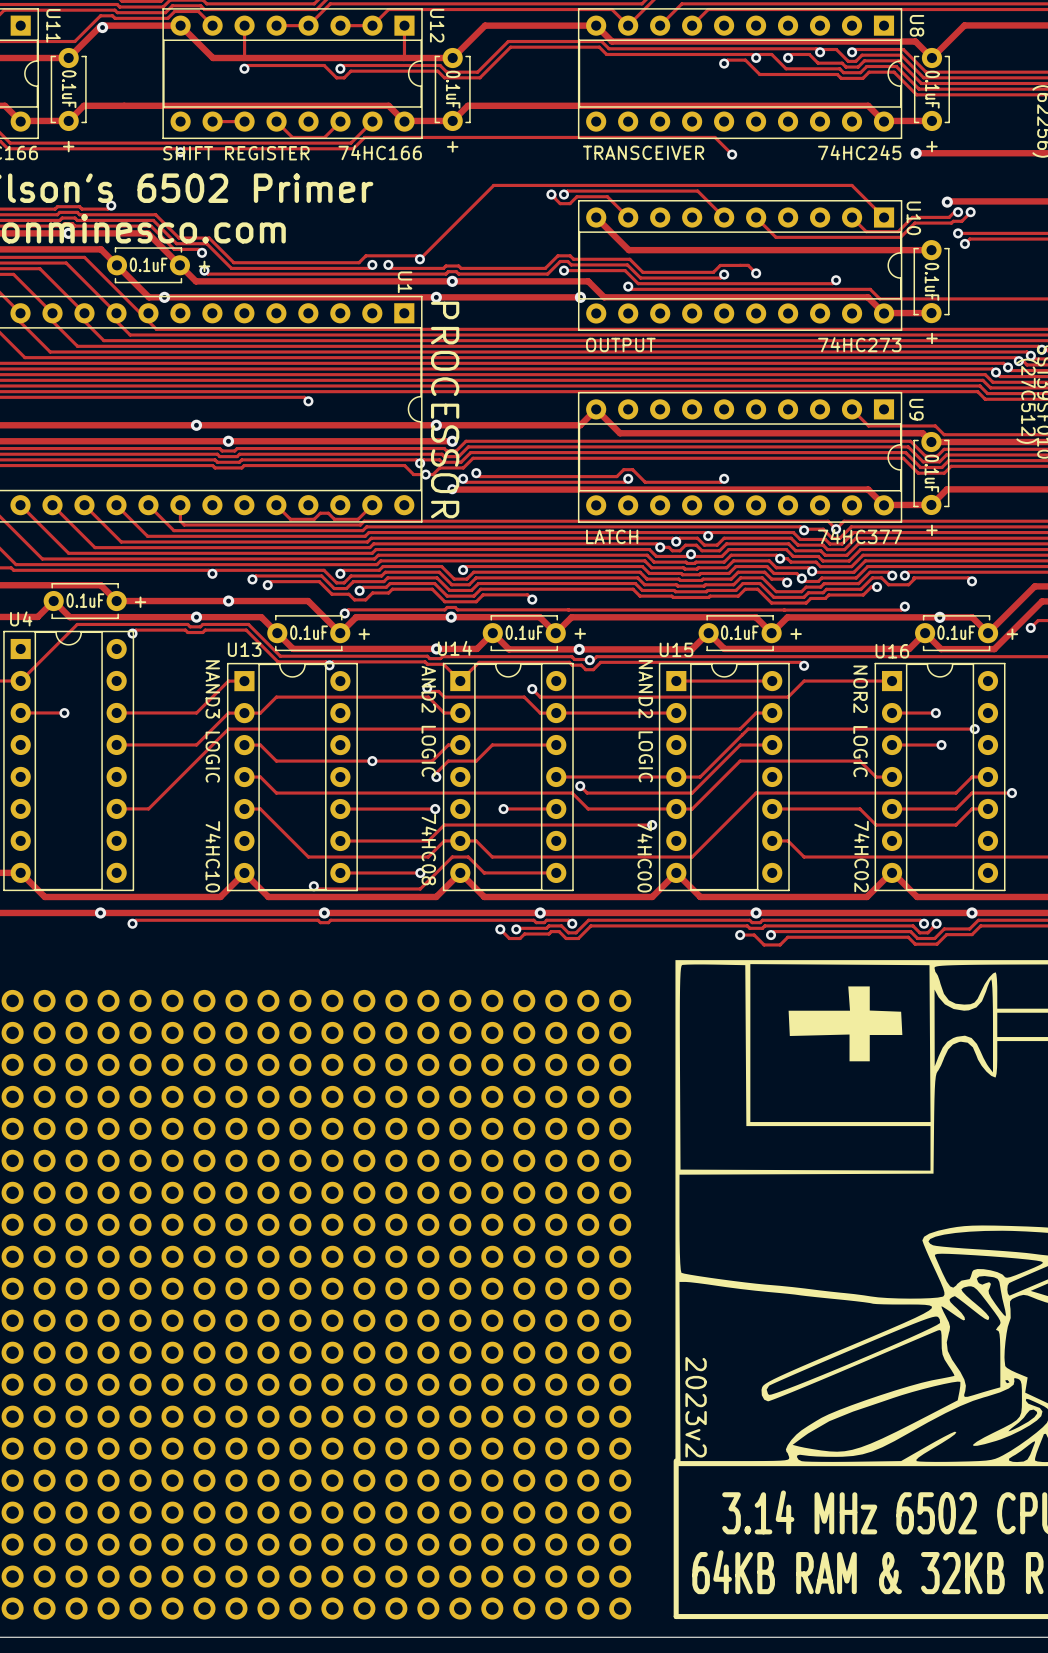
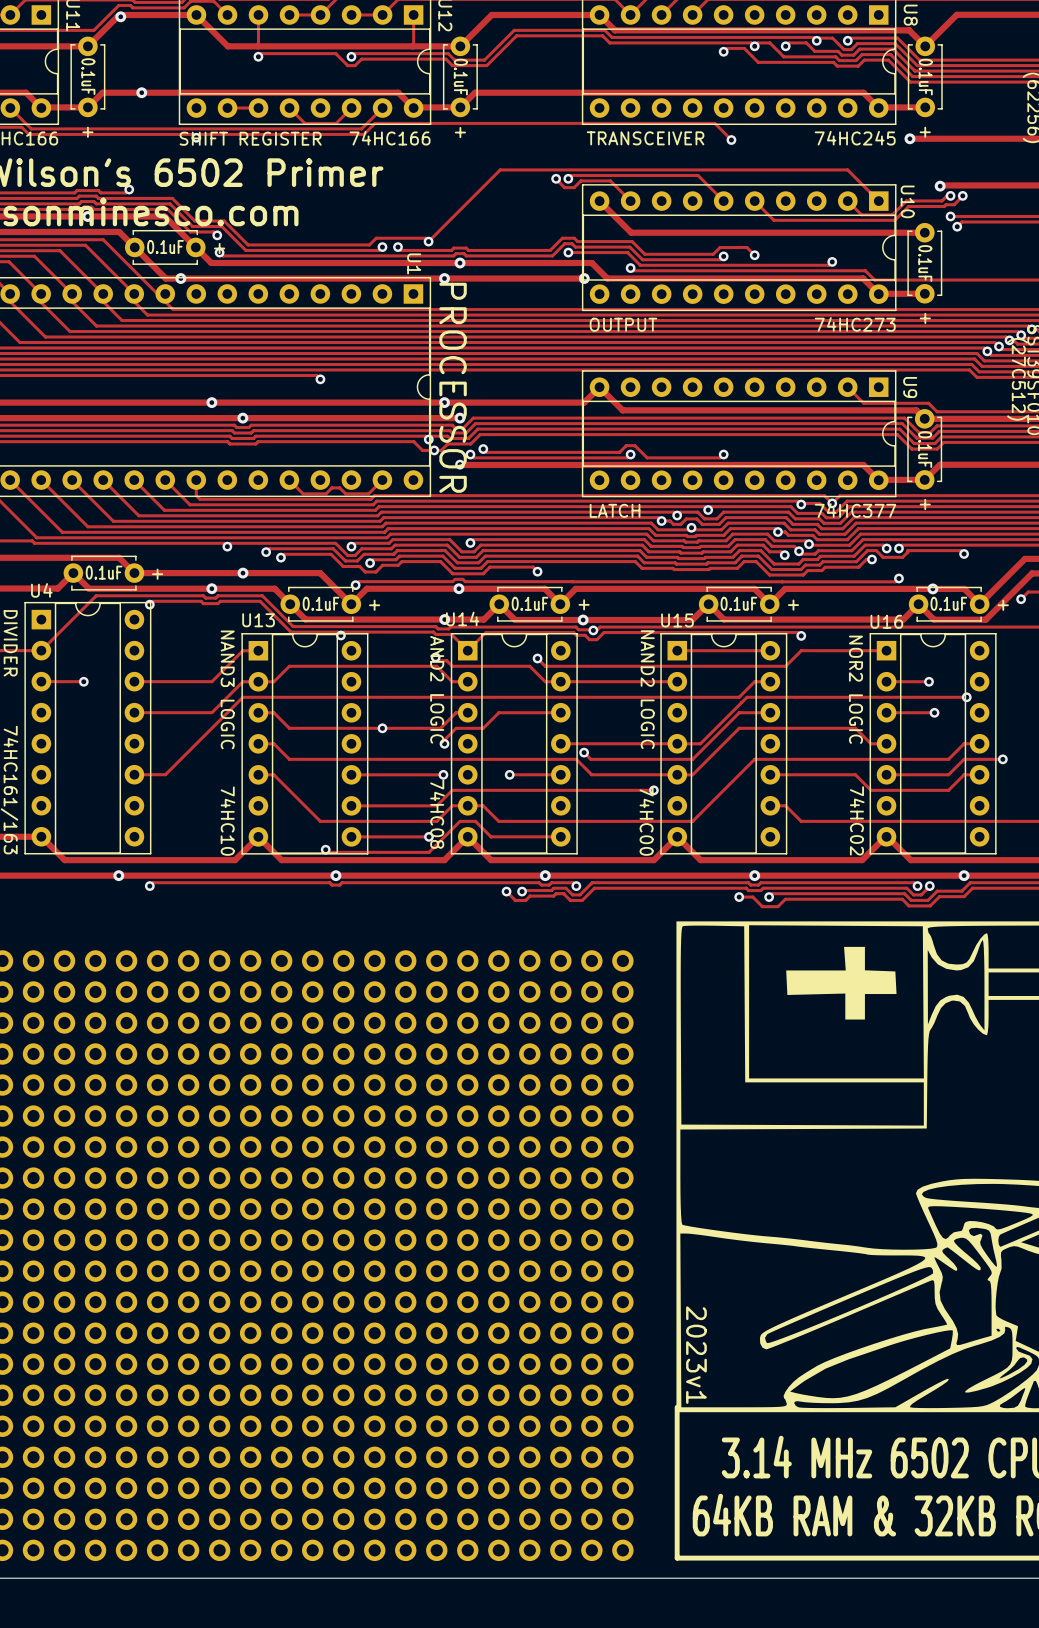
via: none -> (141, 92)
text: 2023v2 (696, 1407) -> 2023v1 (696, 1355)

